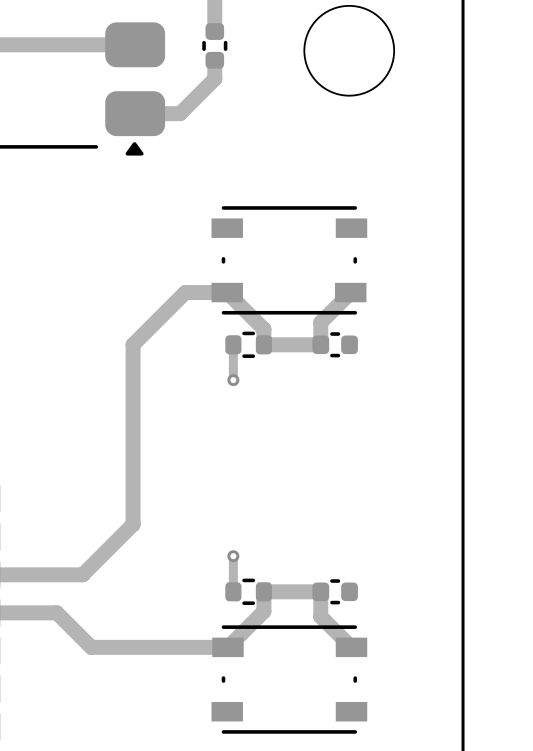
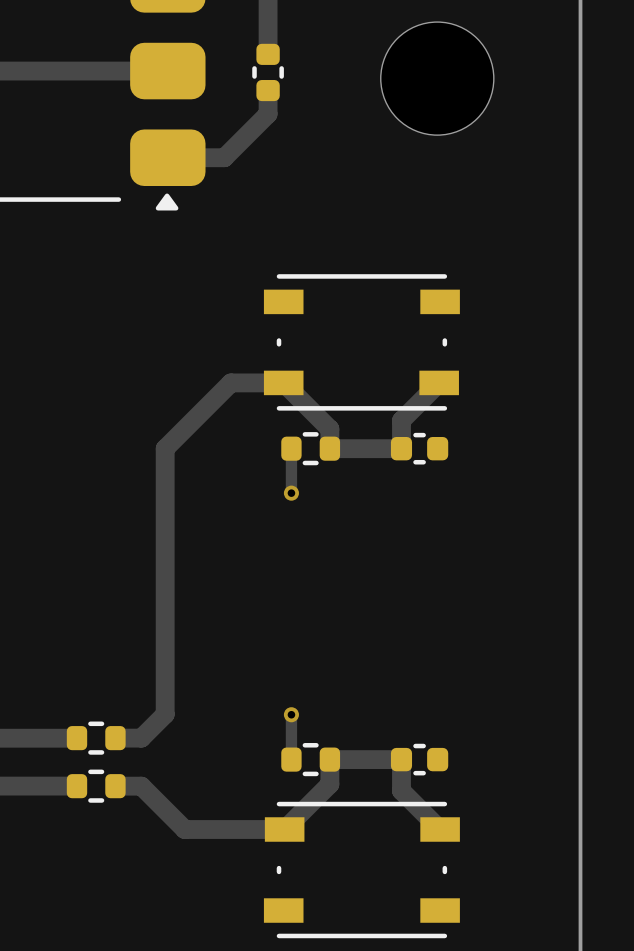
track: (133, 524) (82, 574) (62, 574) -> (165, 674) (165, 714) (141, 738) (115, 738)
part: none -> (96, 738)
track: (56, 612) (91, 647) (148, 647) -> (115, 786) (141, 786) (184, 829)
part: none -> (96, 786)

